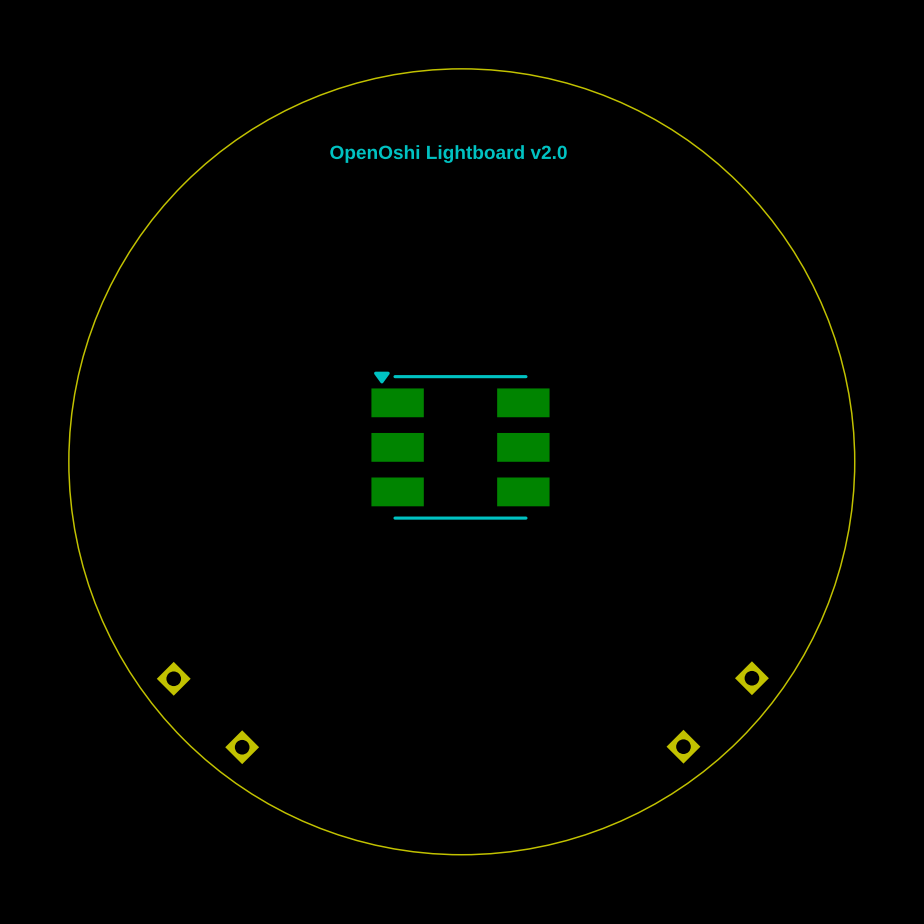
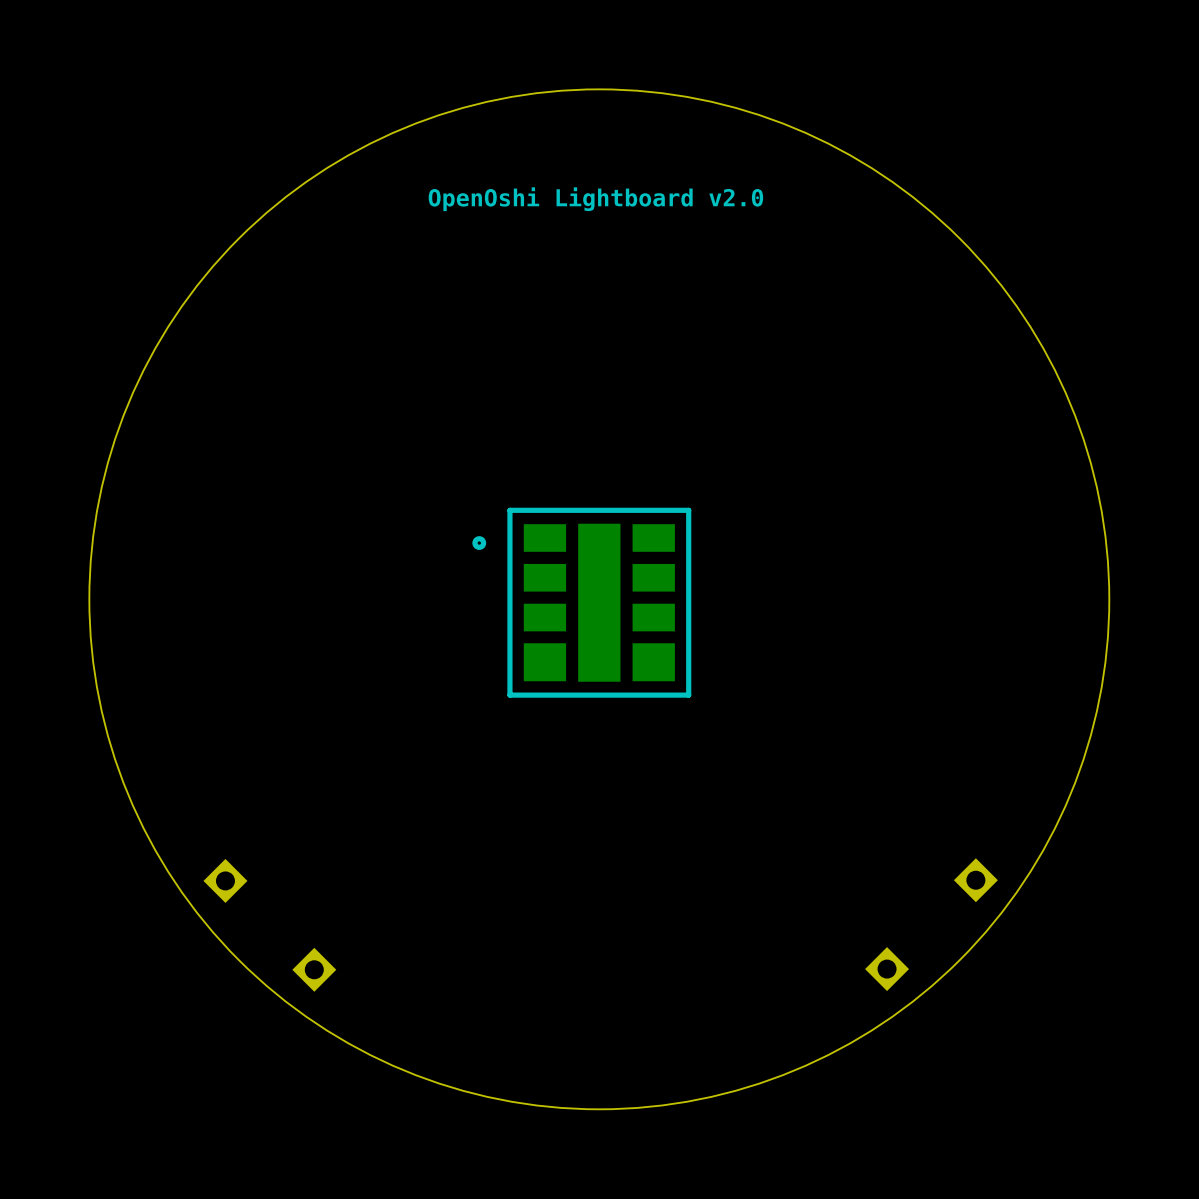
part footprint: [371, 371, 550, 520] -> [472, 507, 692, 698]

